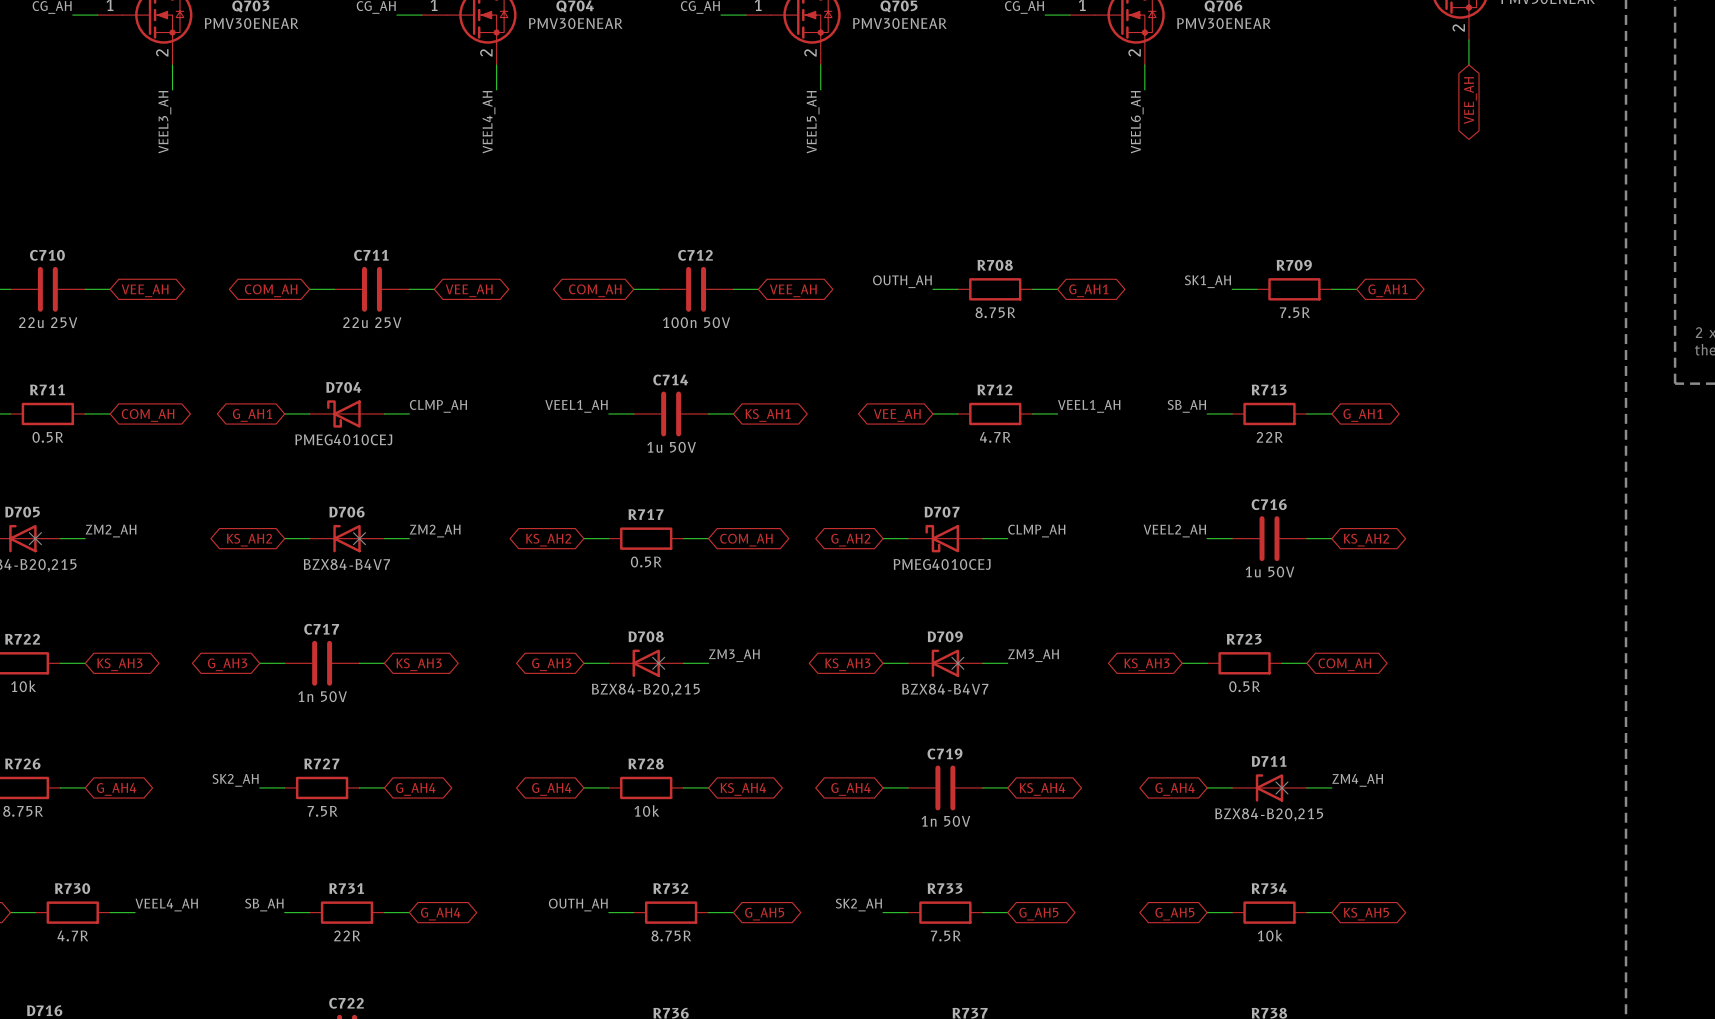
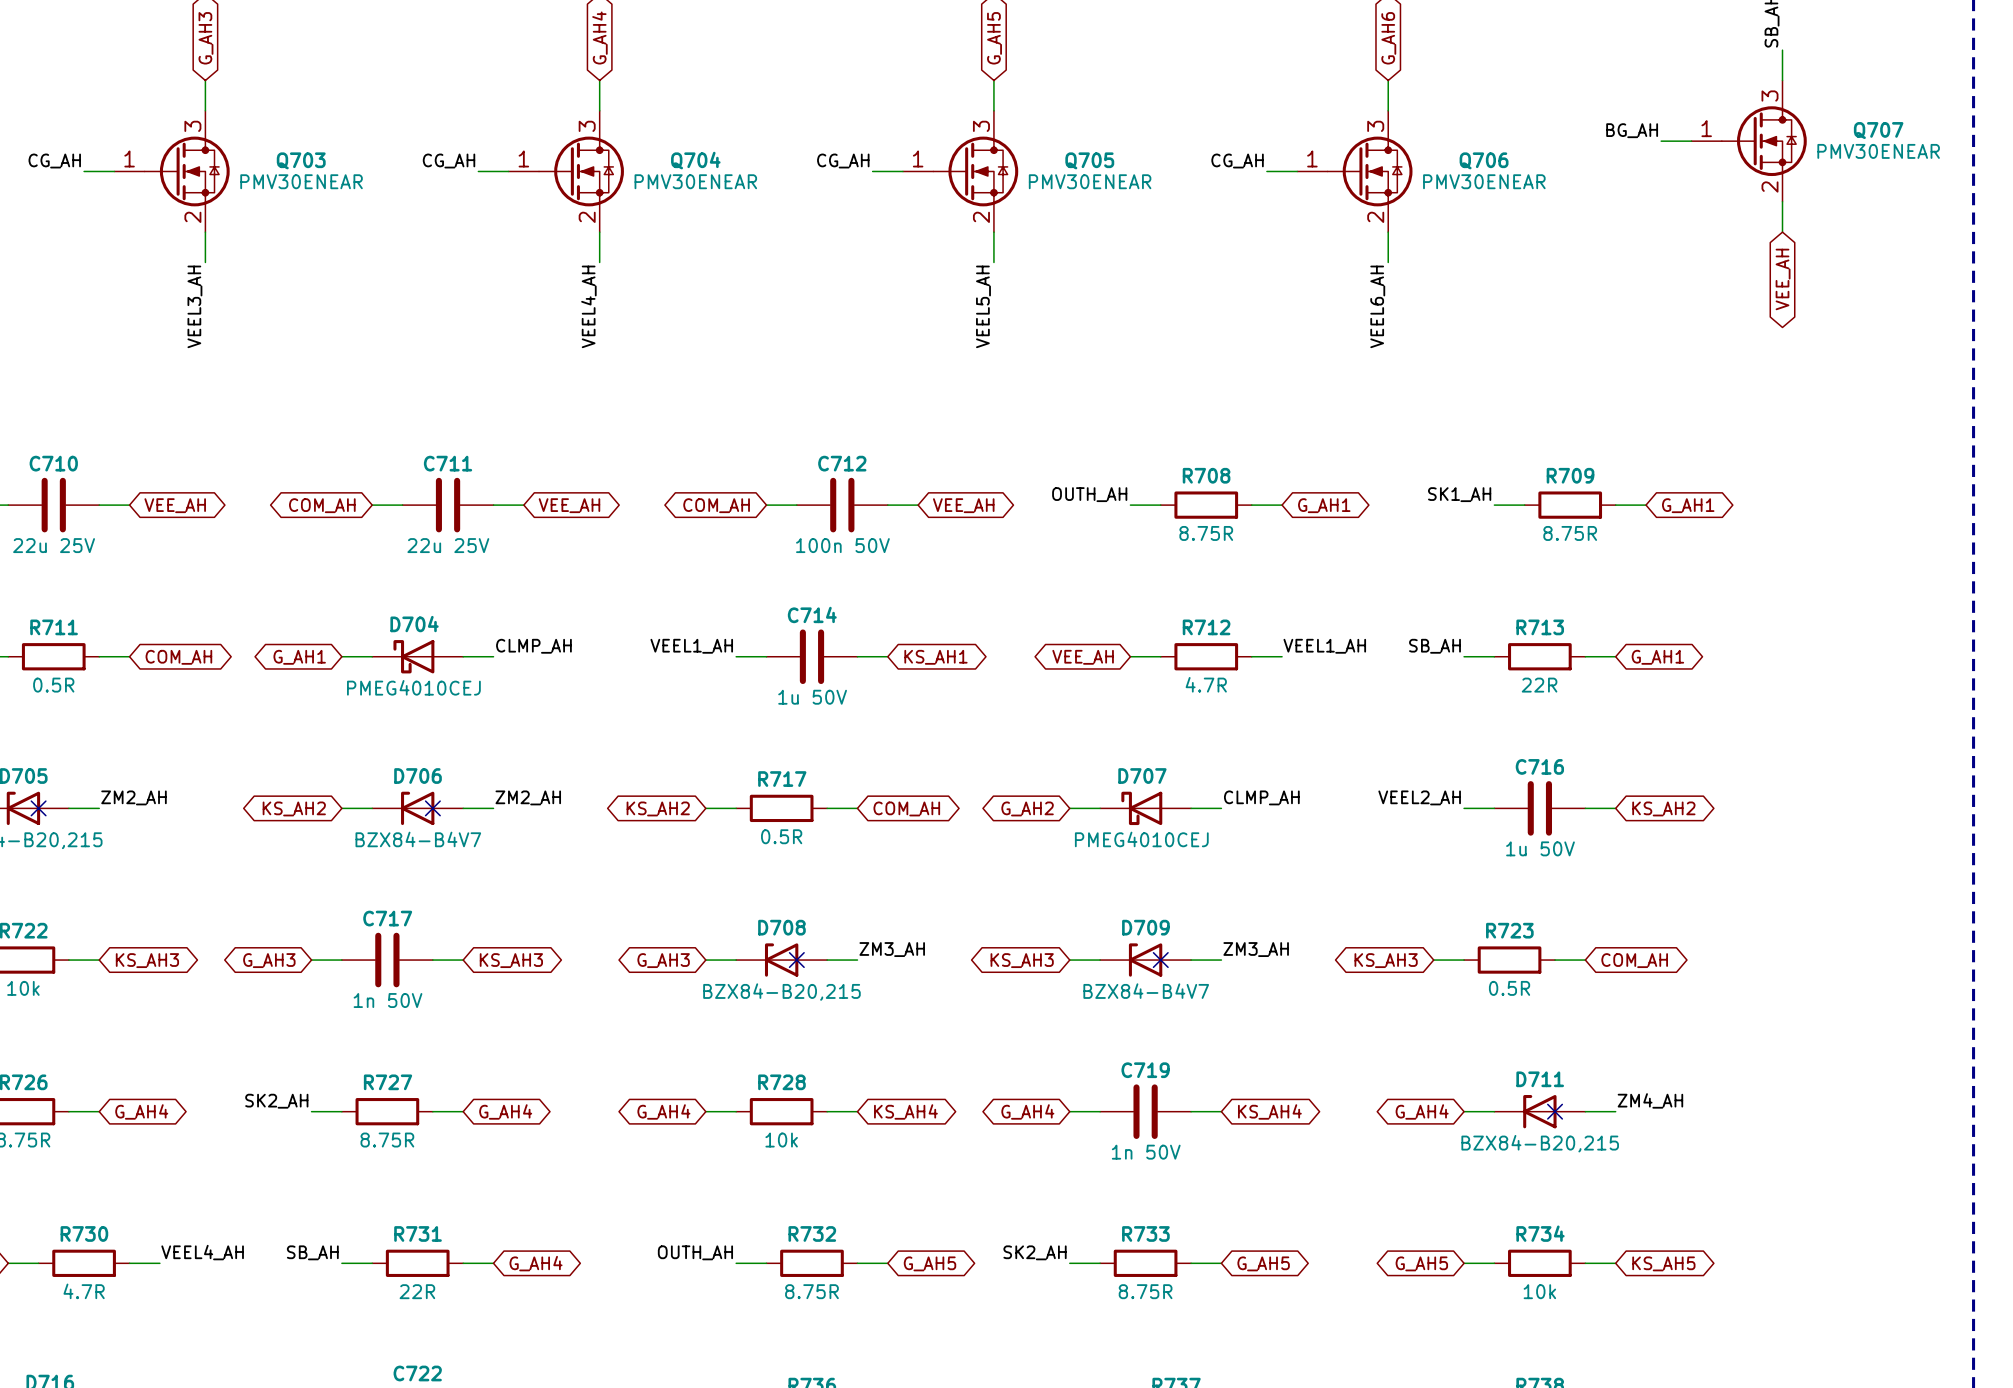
R709 value: 7.5R (1294, 312) -> 8.75R (1570, 533)
R727 value: 7.5R (322, 811) -> 8.75R (387, 1140)
R733 value: 7.5R (945, 936) -> 8.75R (1145, 1291)

